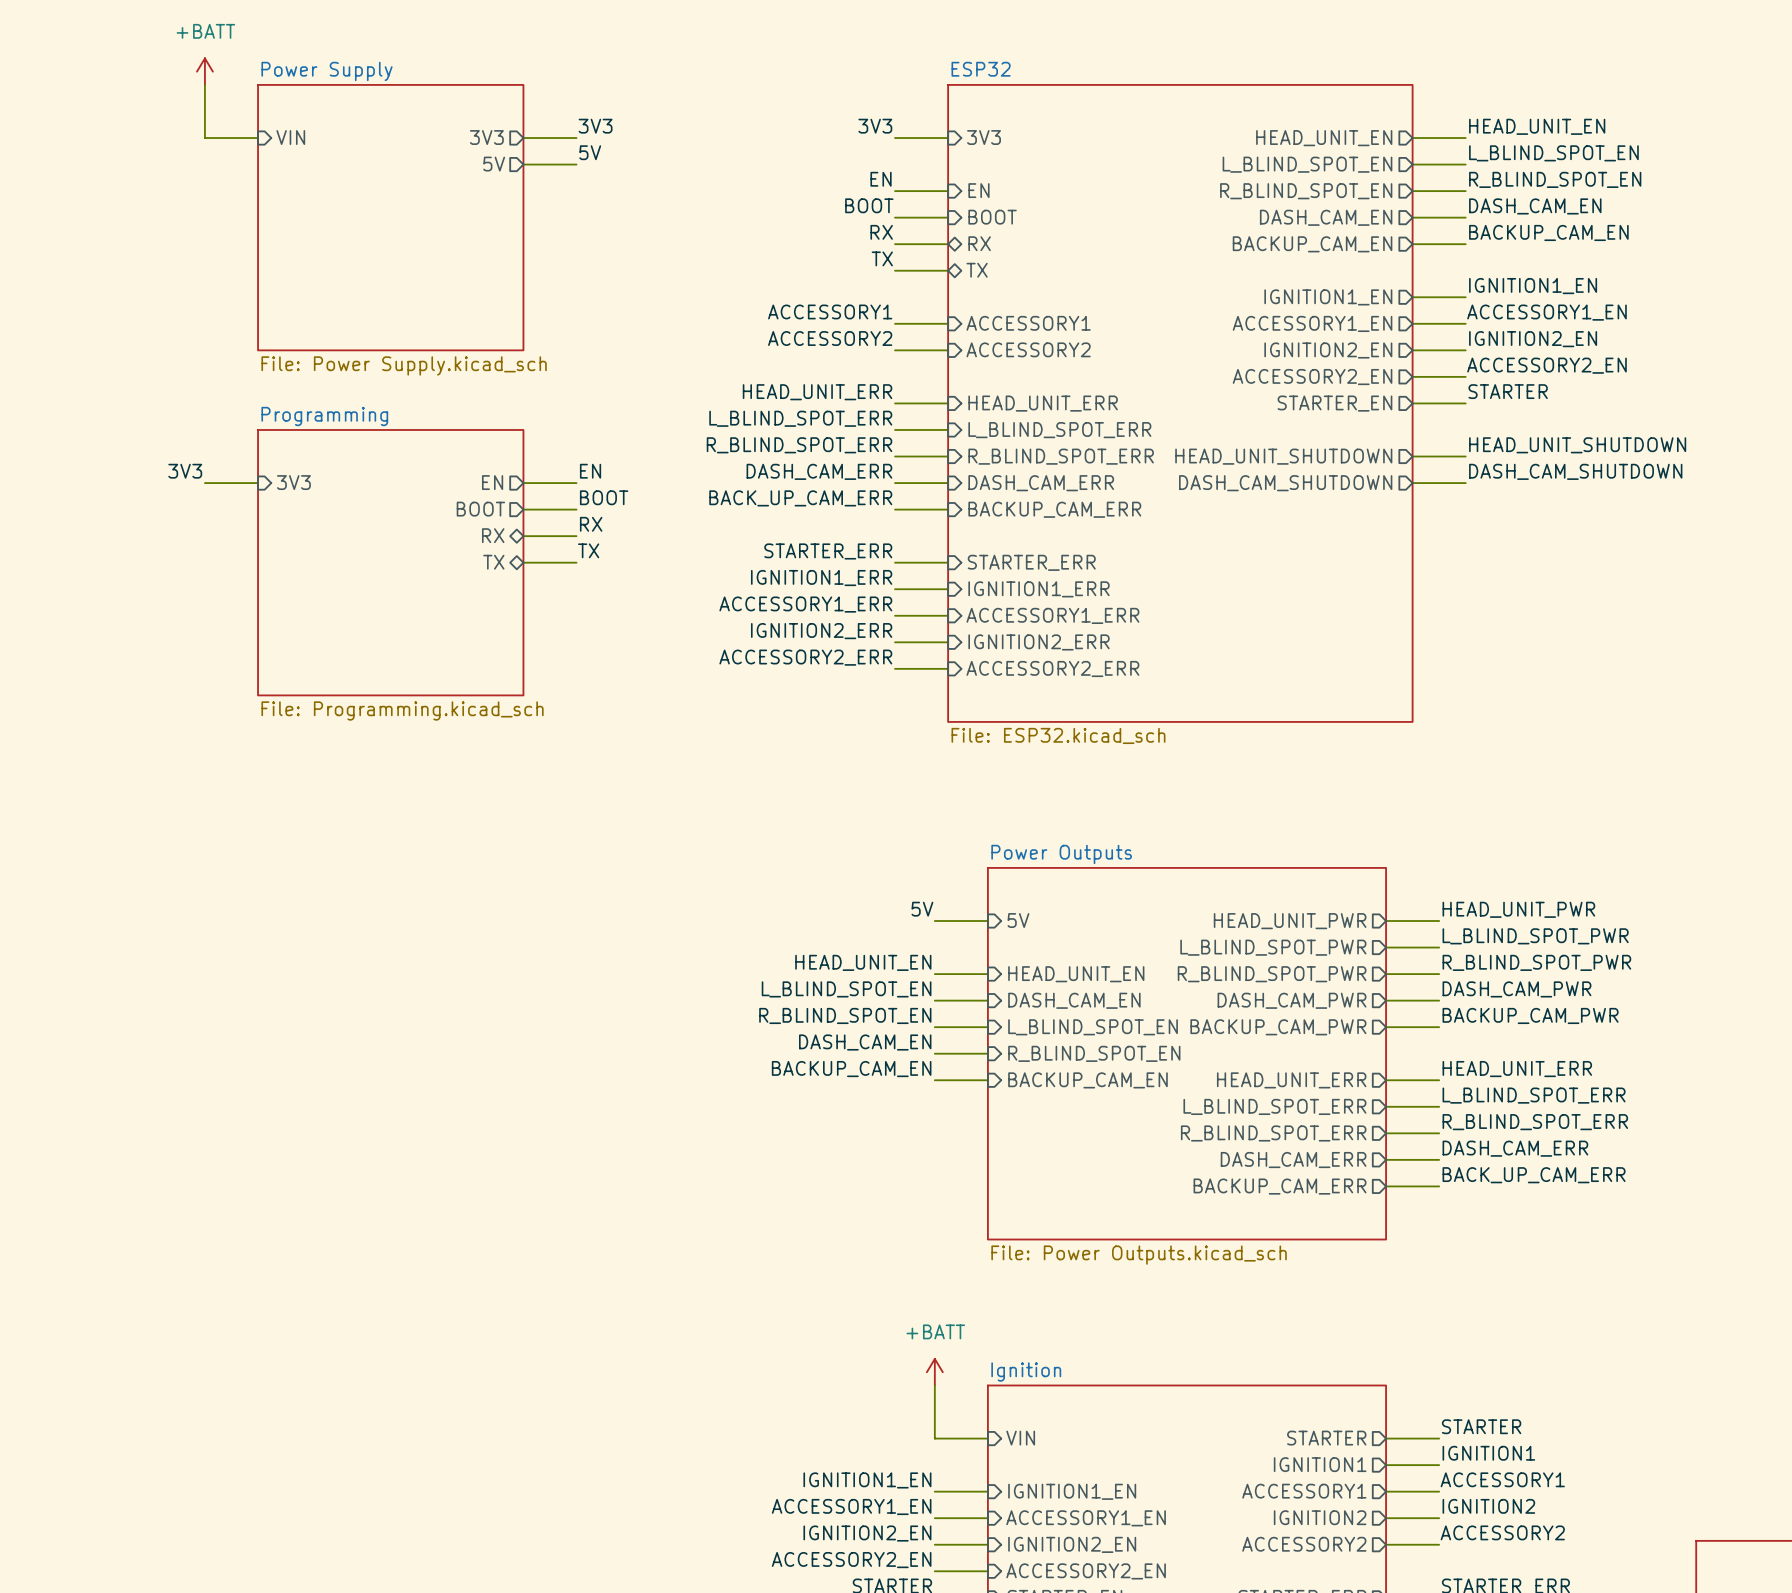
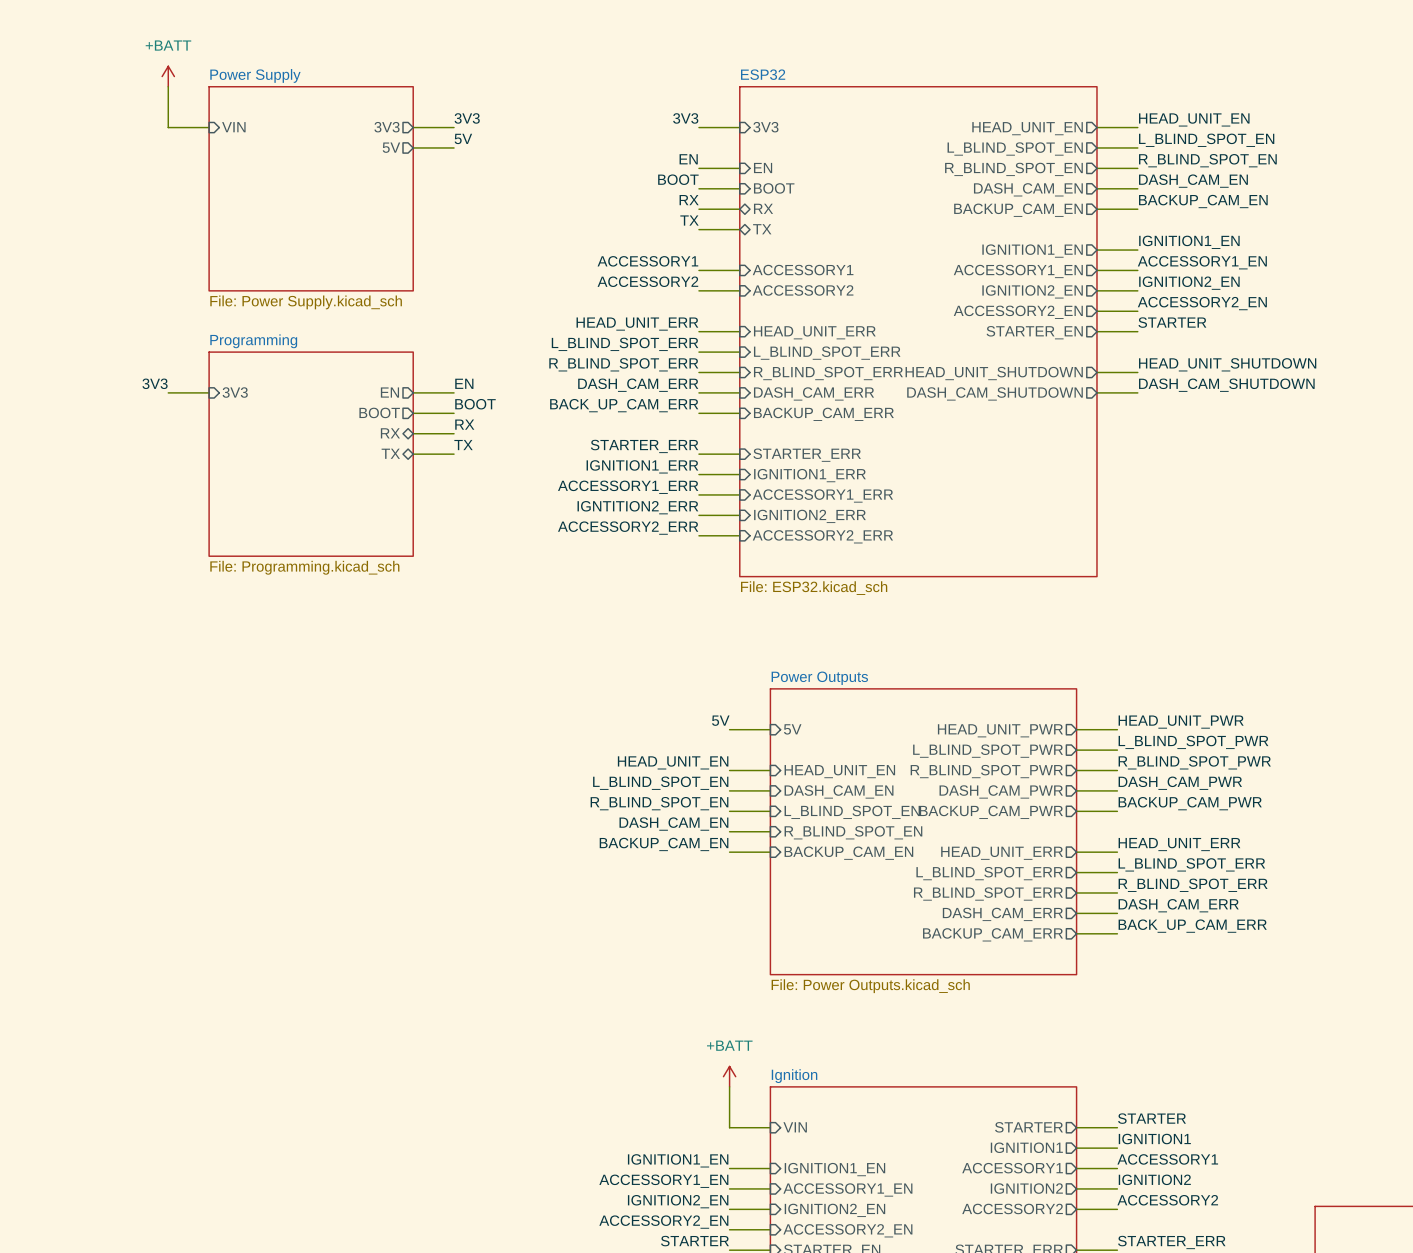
label: IGNITION2_ERR (821, 631) -> IGNTITION2_ERR (637, 507)

